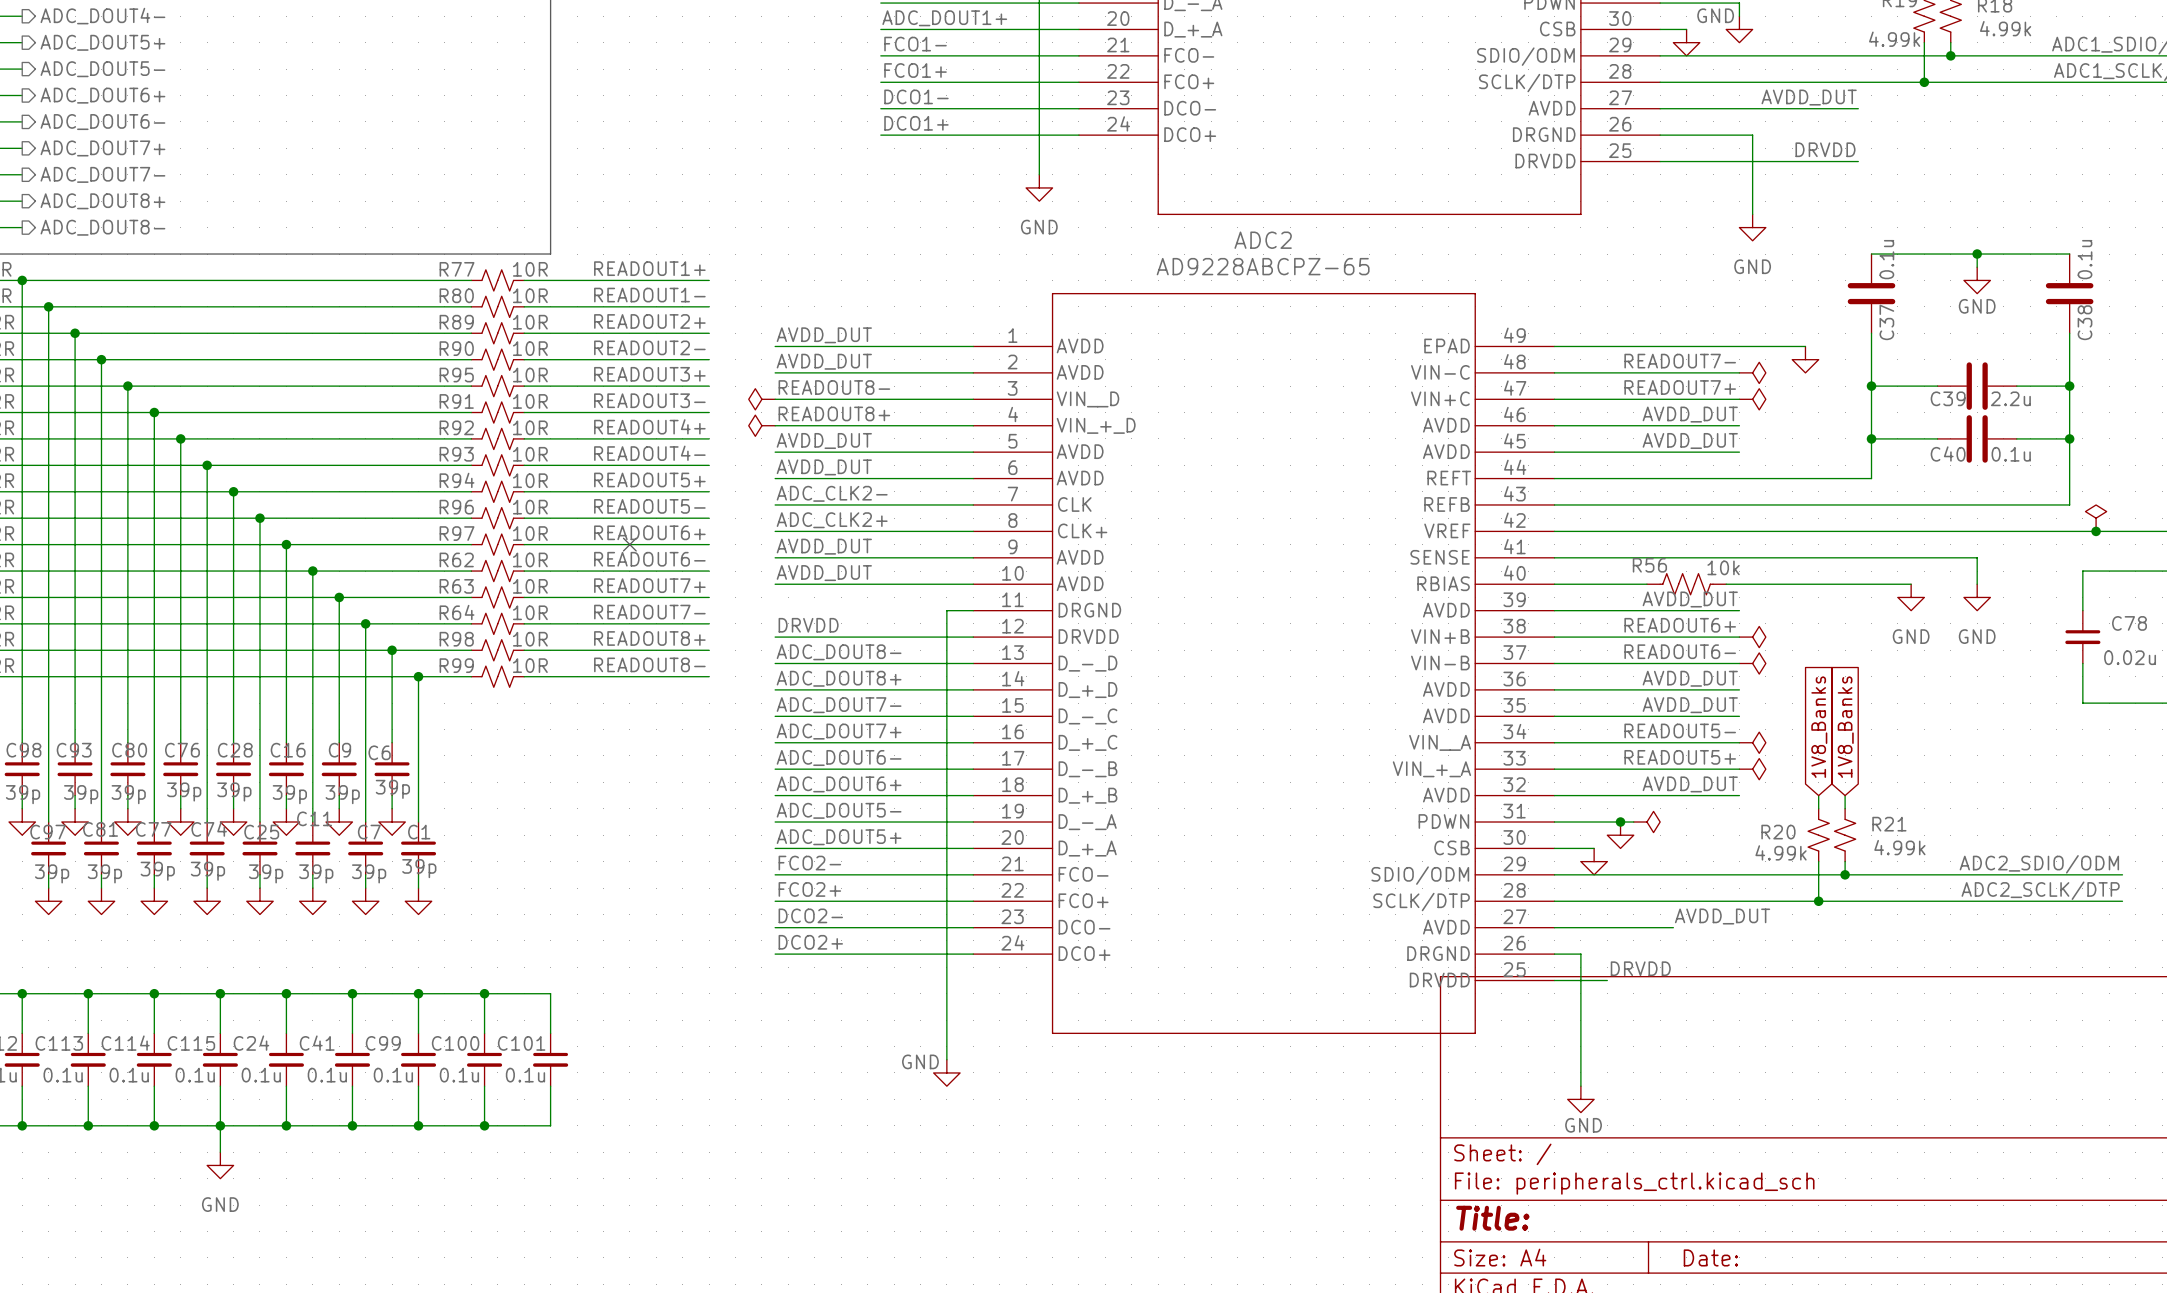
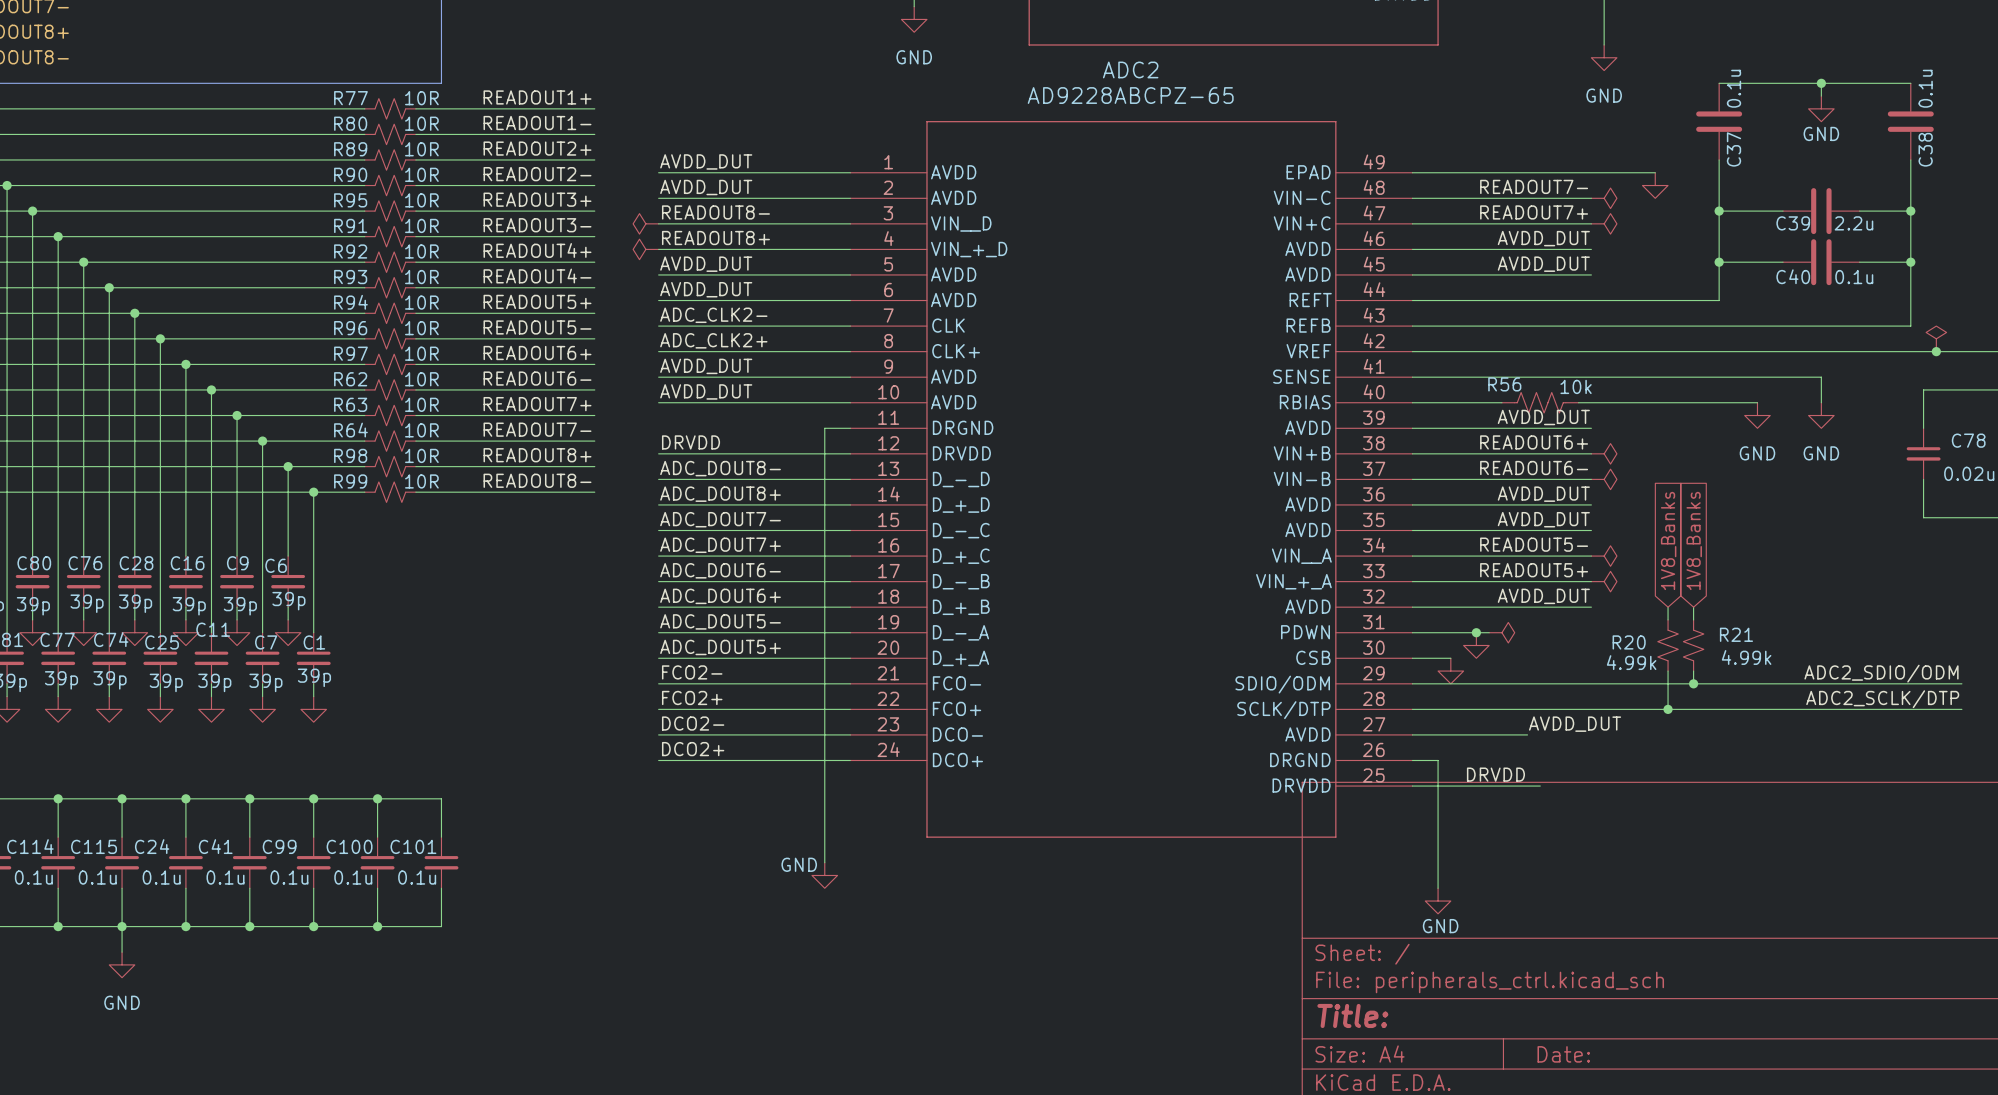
no-connect mark: (629, 544) -> none
wire: none -> (1463, 786) (1540, 786)

